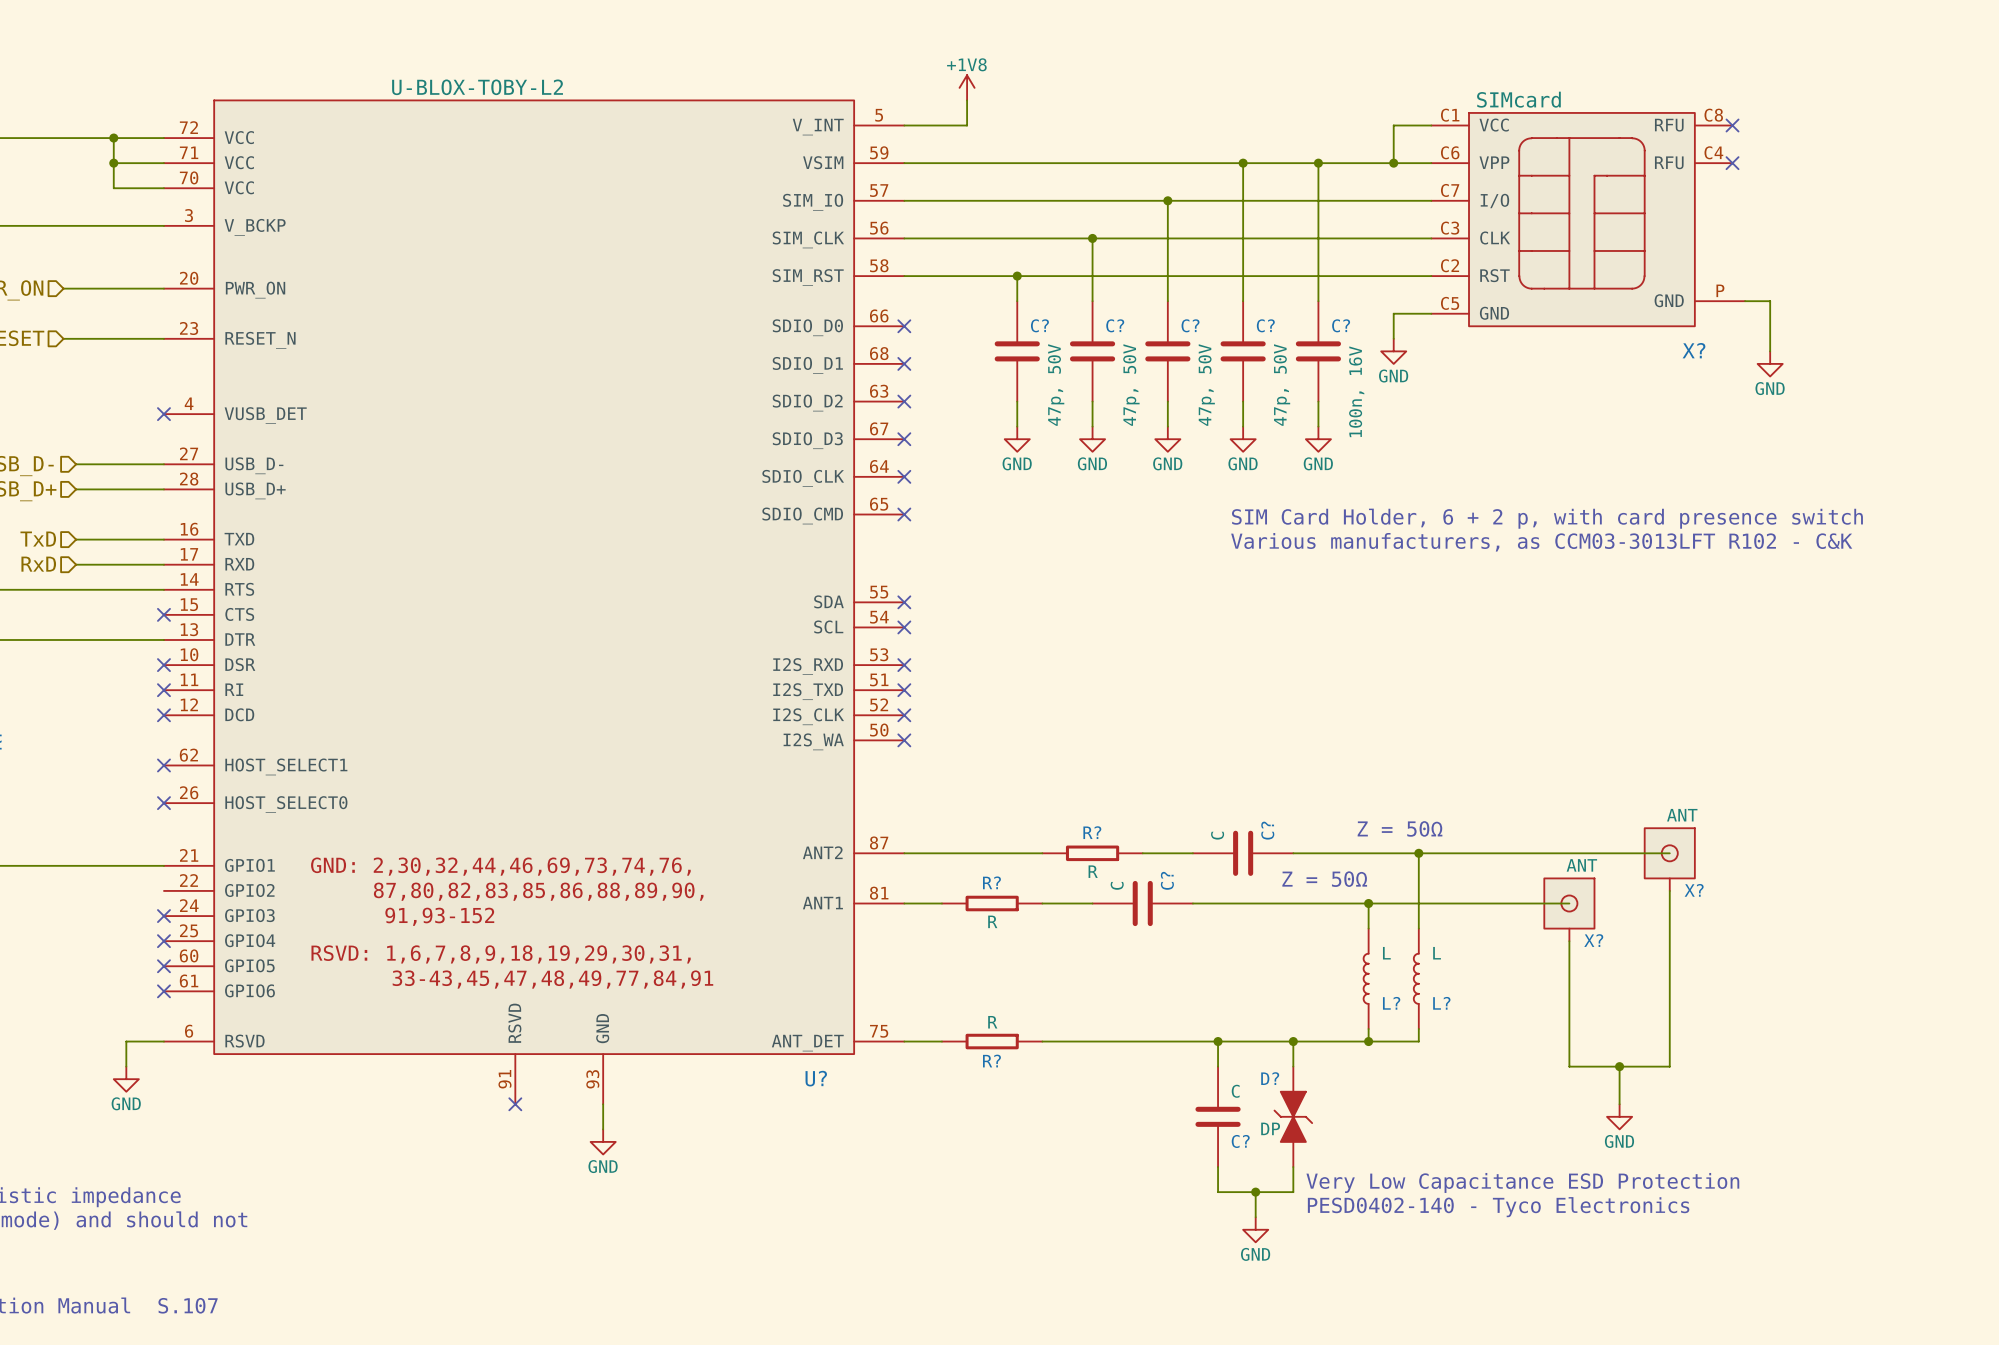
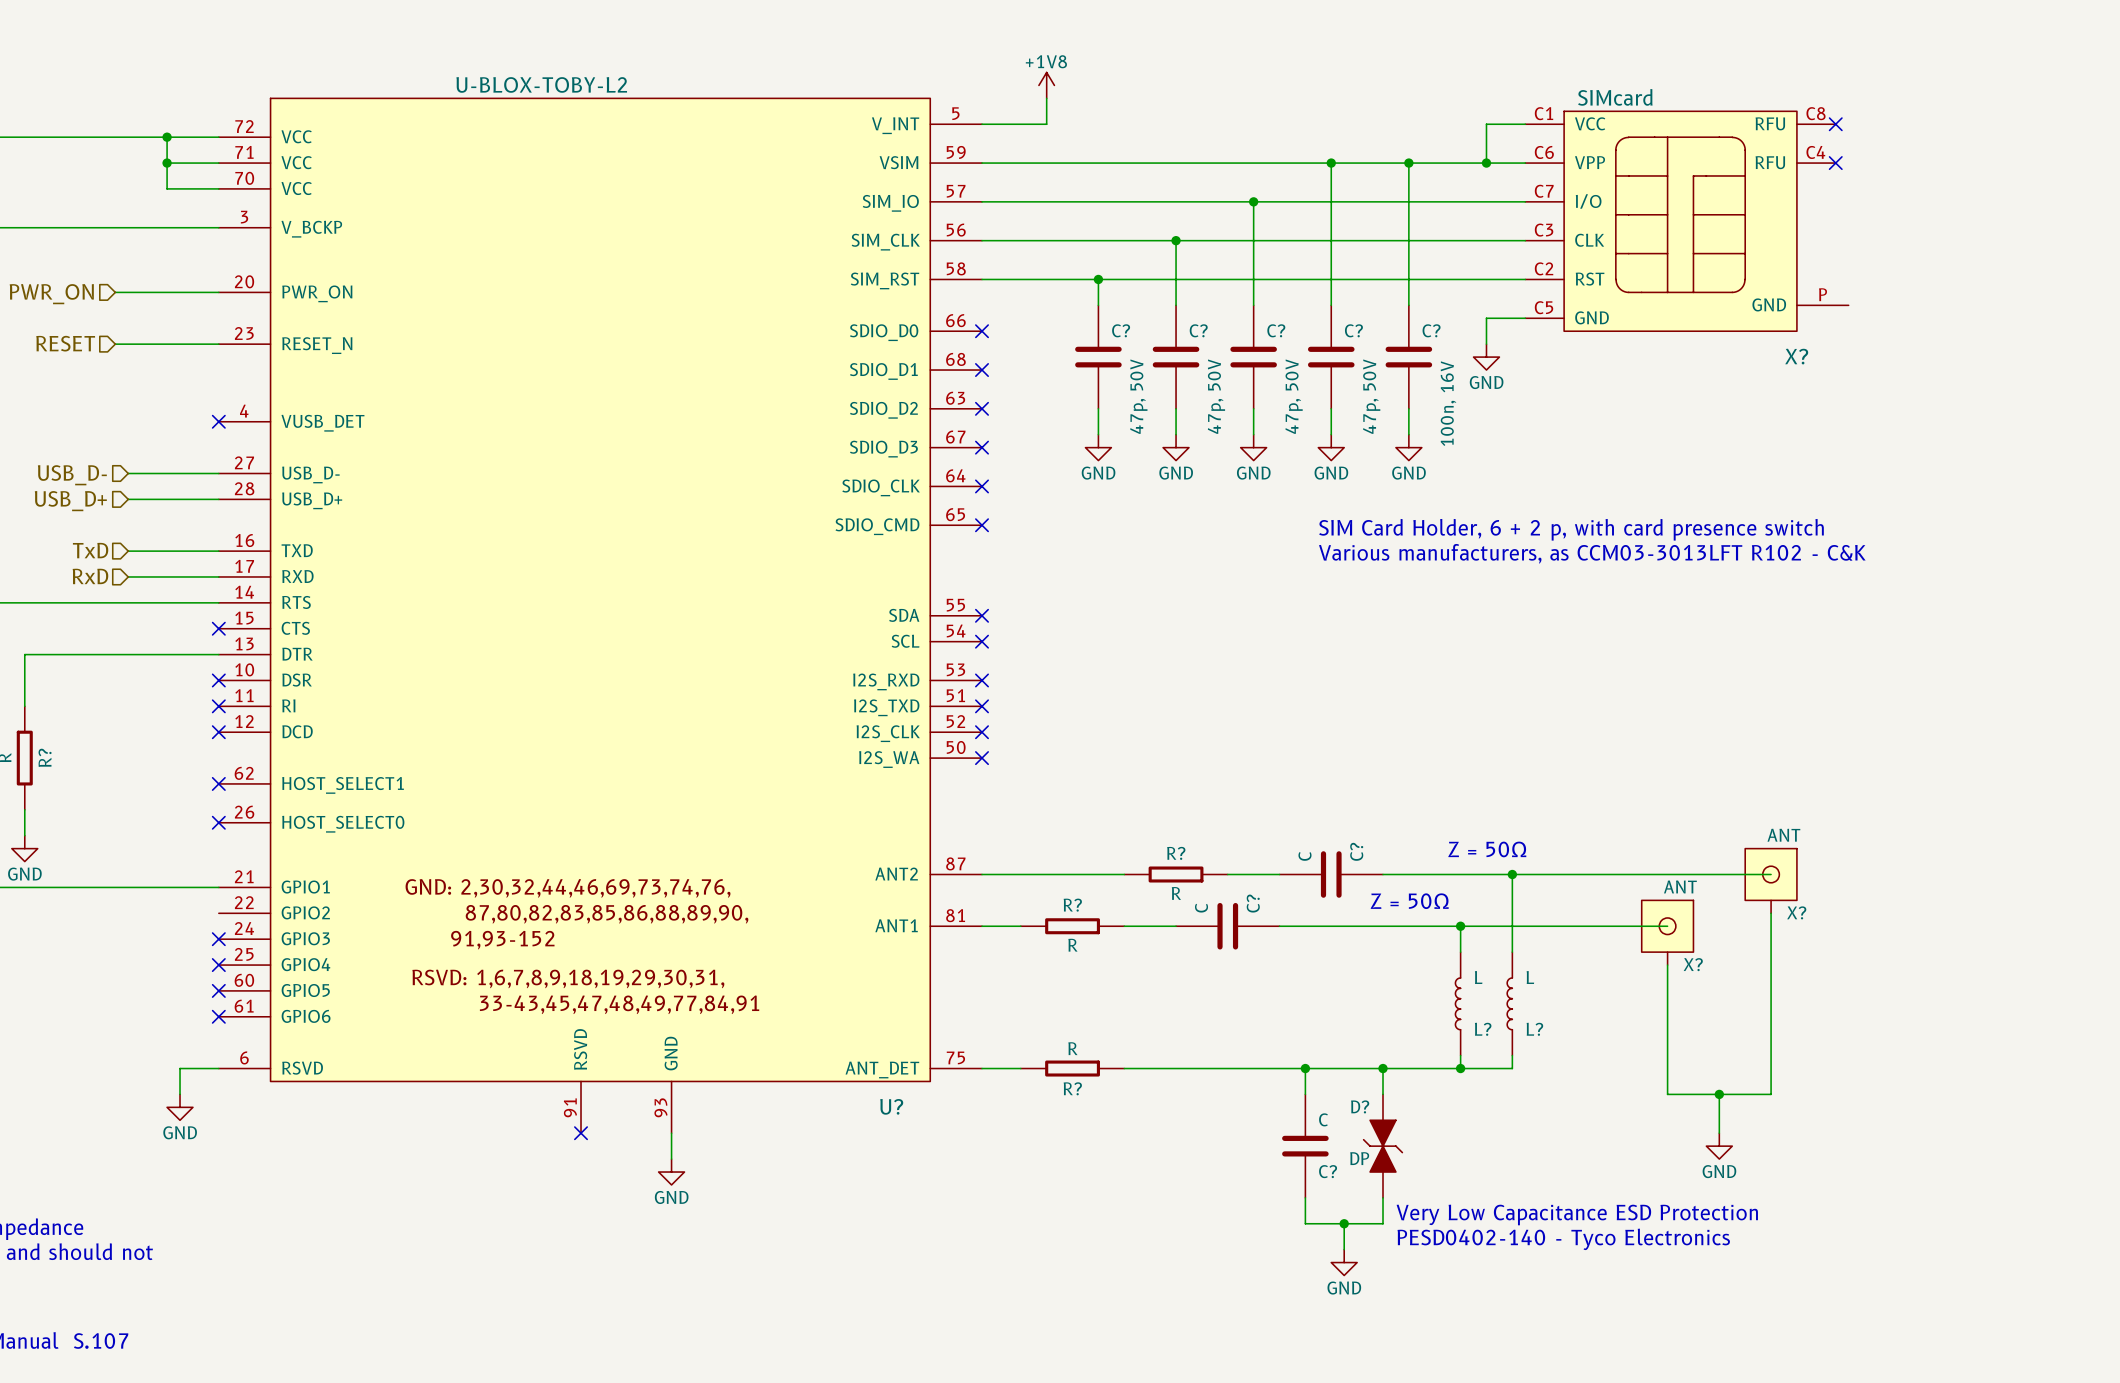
wire: (1745, 301) (1770, 301) (1770, 351) -> none
power symbol: GND (1770, 363) -> none

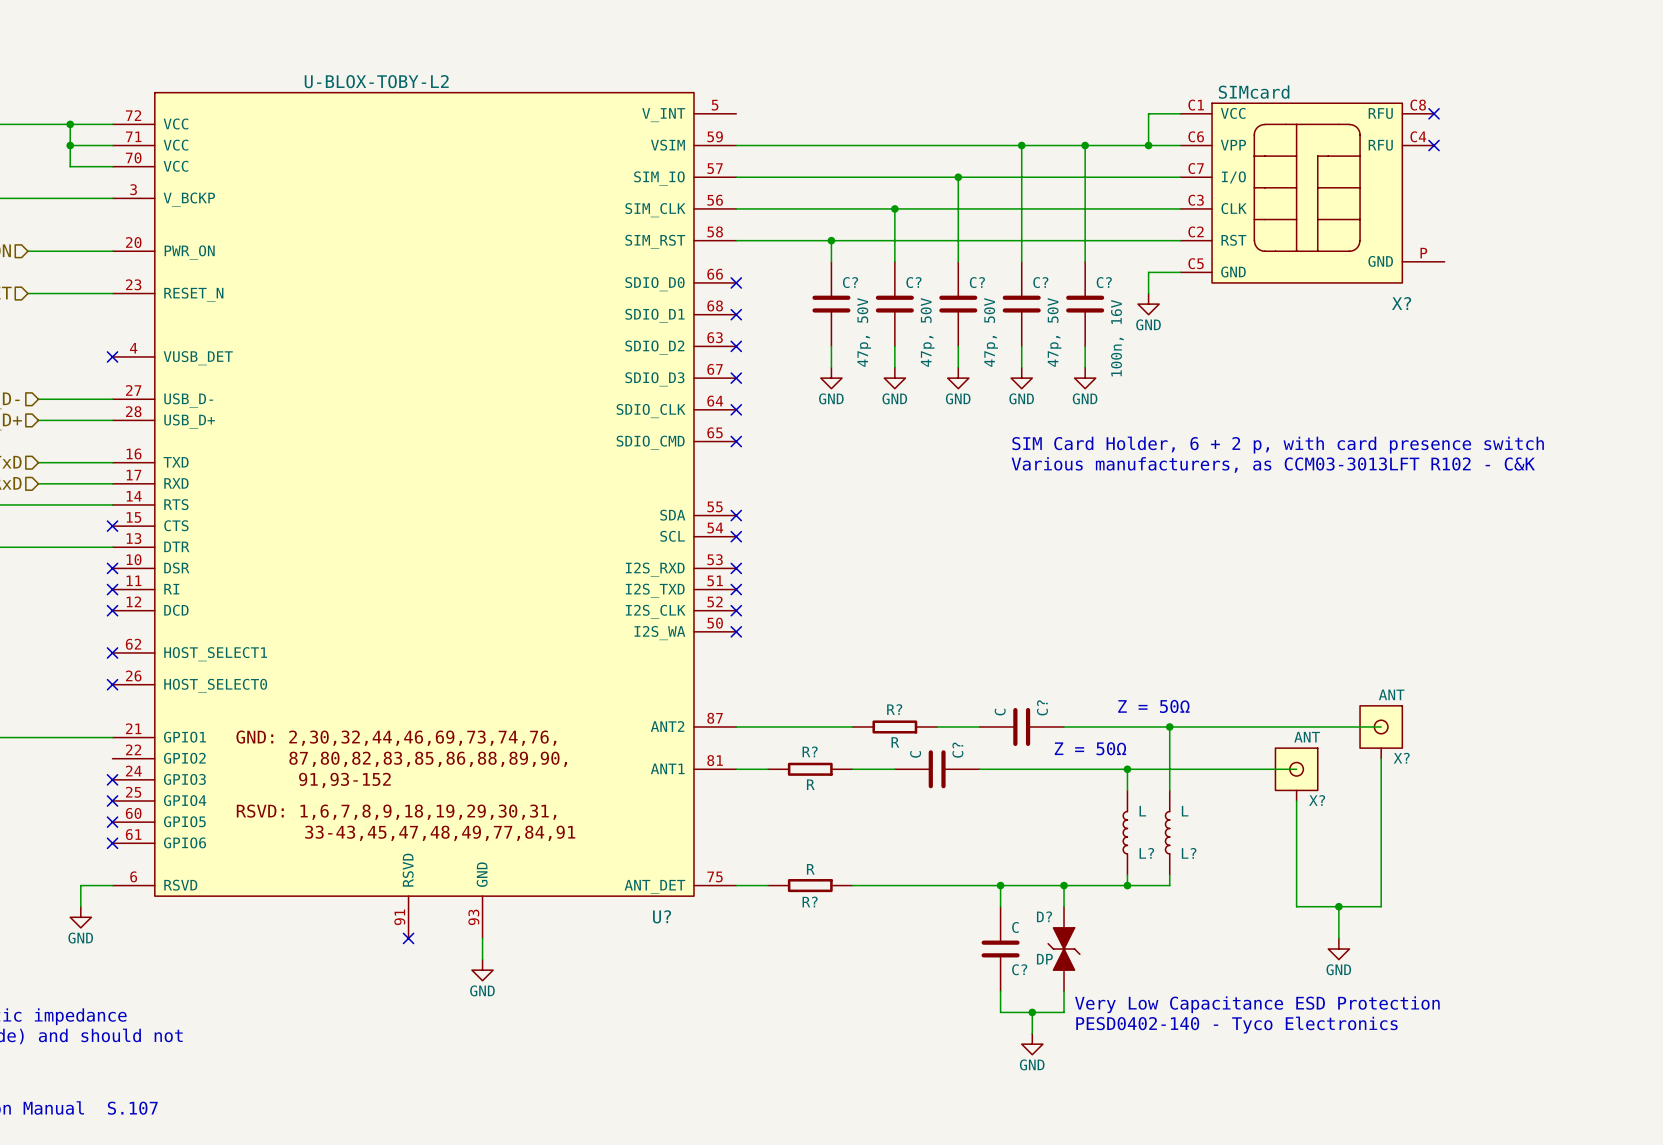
power symbol: +1V8 (1046, 85) -> none
wire: (1046, 98) (1046, 124) (982, 124) -> none

